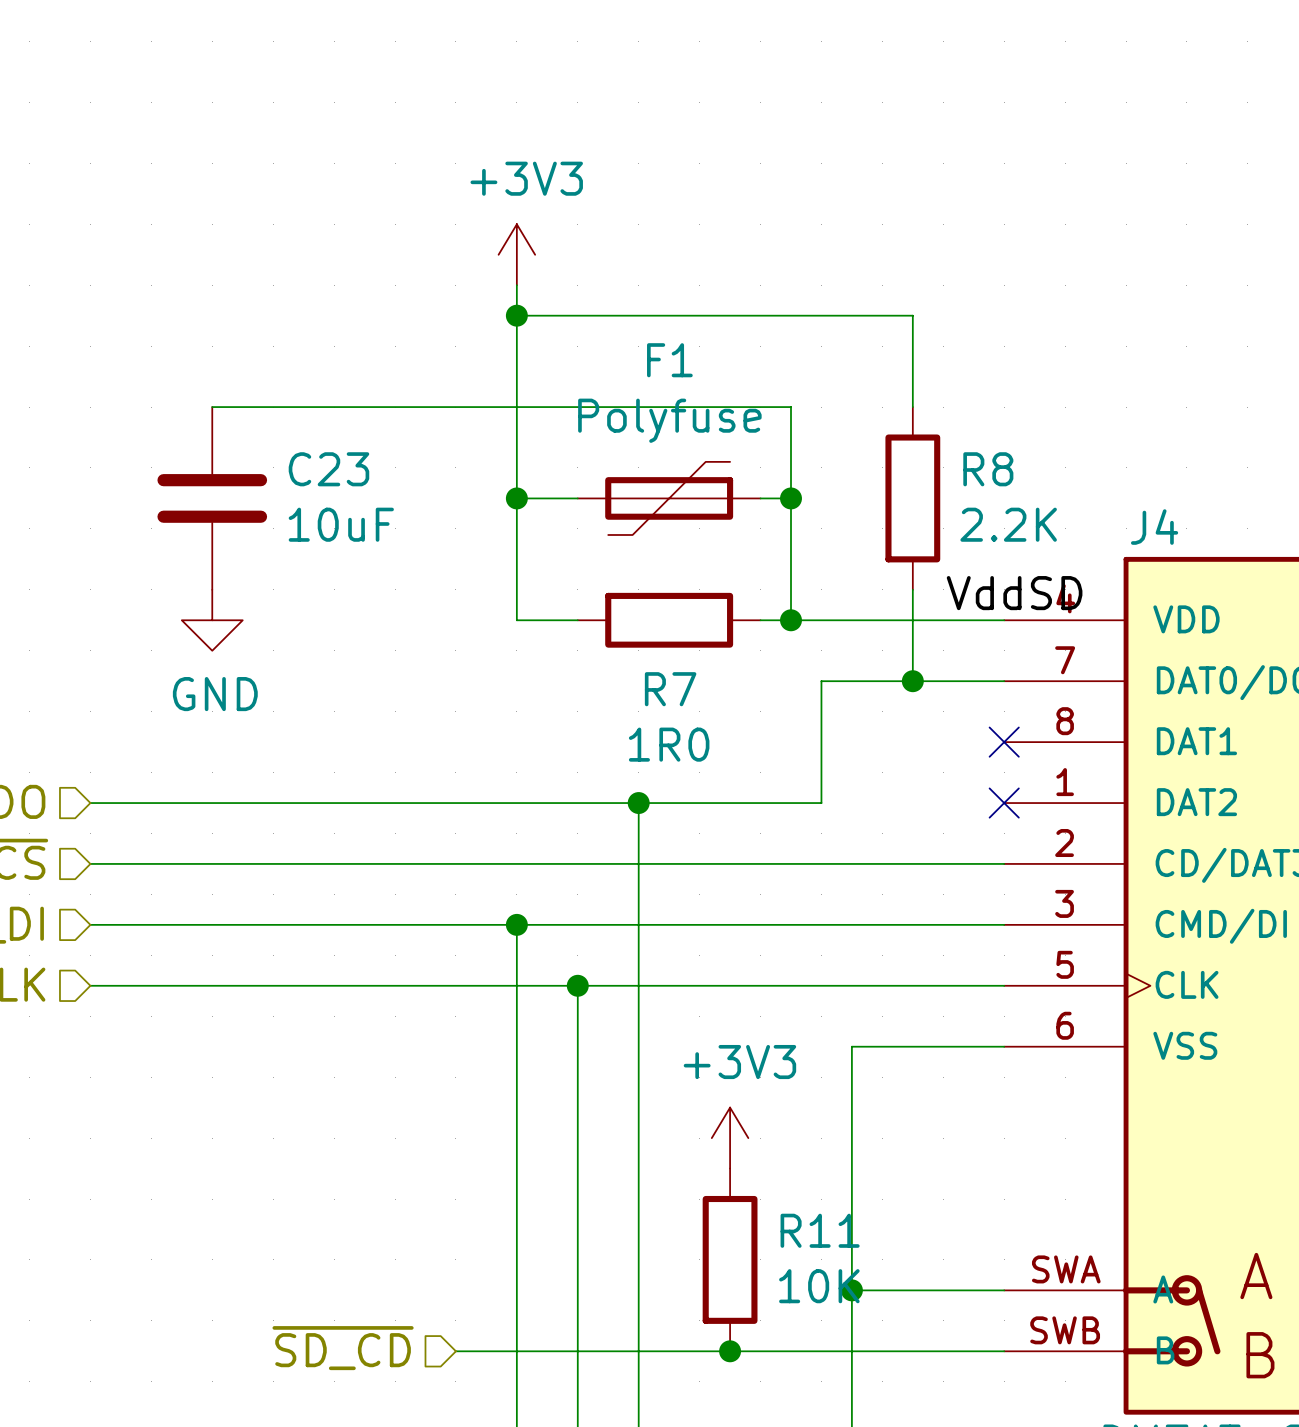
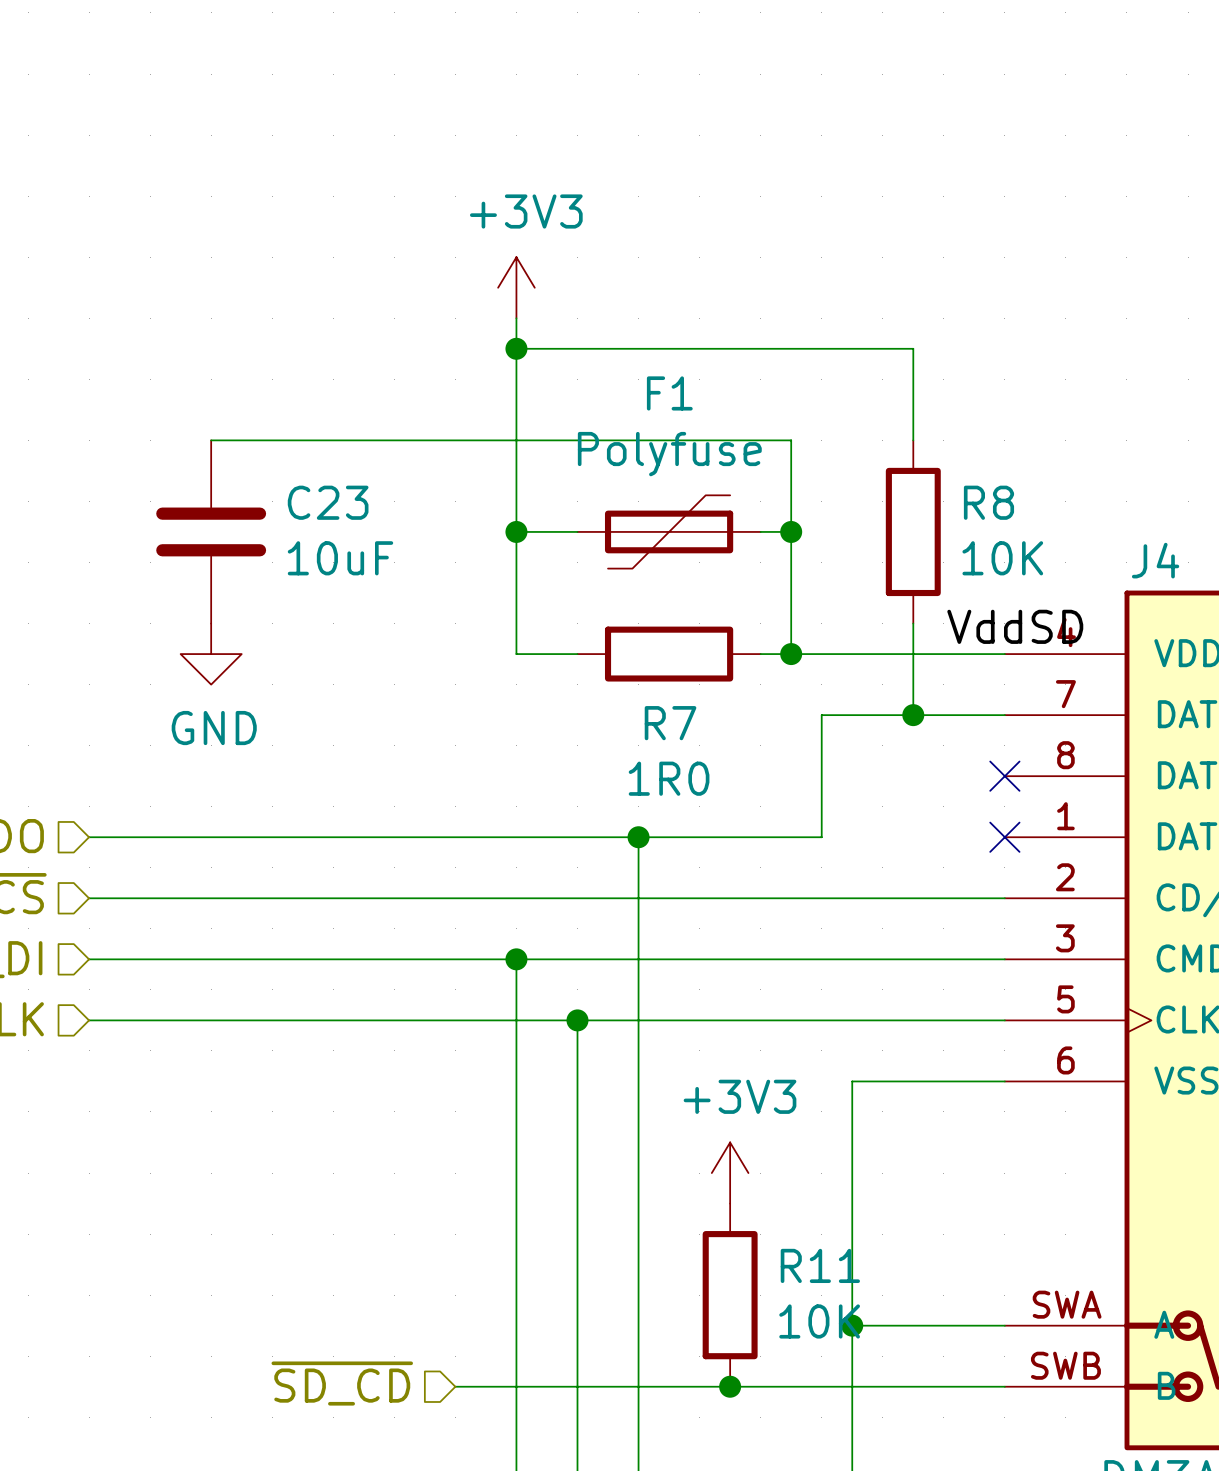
R8 value: 2.2K (1008, 524) -> 10K (1002, 558)

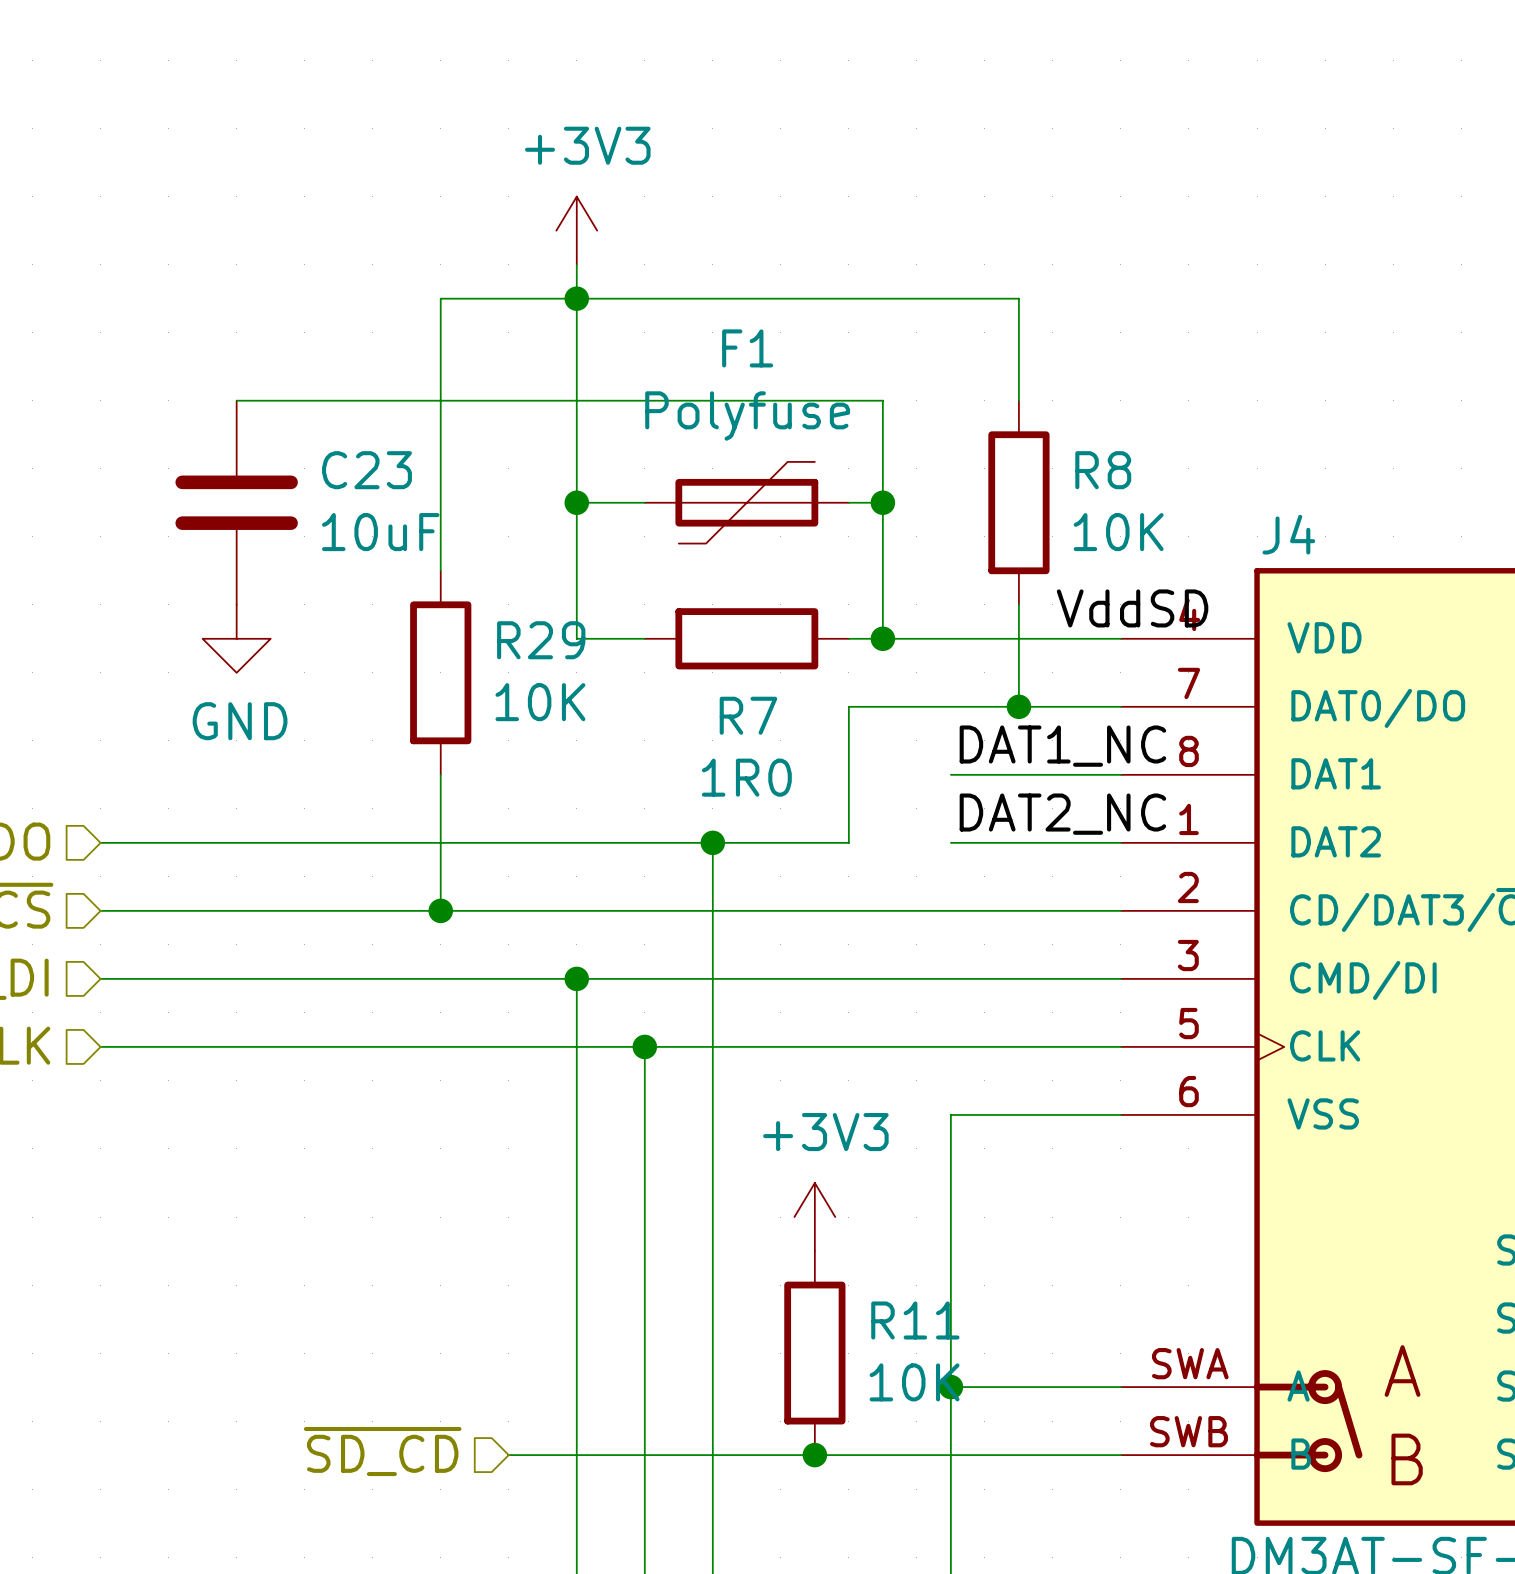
wire: none -> (576, 298) (440, 298) (440, 570)
R29: none -> 10K (440, 672)
wire: (821, 715) (821, 837) (760, 837) -> (916, 706) (848, 706) (848, 842)
label: none -> DAT1_NC (1062, 746)
wire: none -> (440, 774) (440, 910)
wire: none -> (950, 774) (1120, 774)
no-connect mark: (1004, 776) -> none
label: none -> DAT2_NC (1062, 814)
wire: none -> (950, 842) (1120, 842)
no-connect mark: (1004, 837) -> none
junction: none -> (440, 910)

